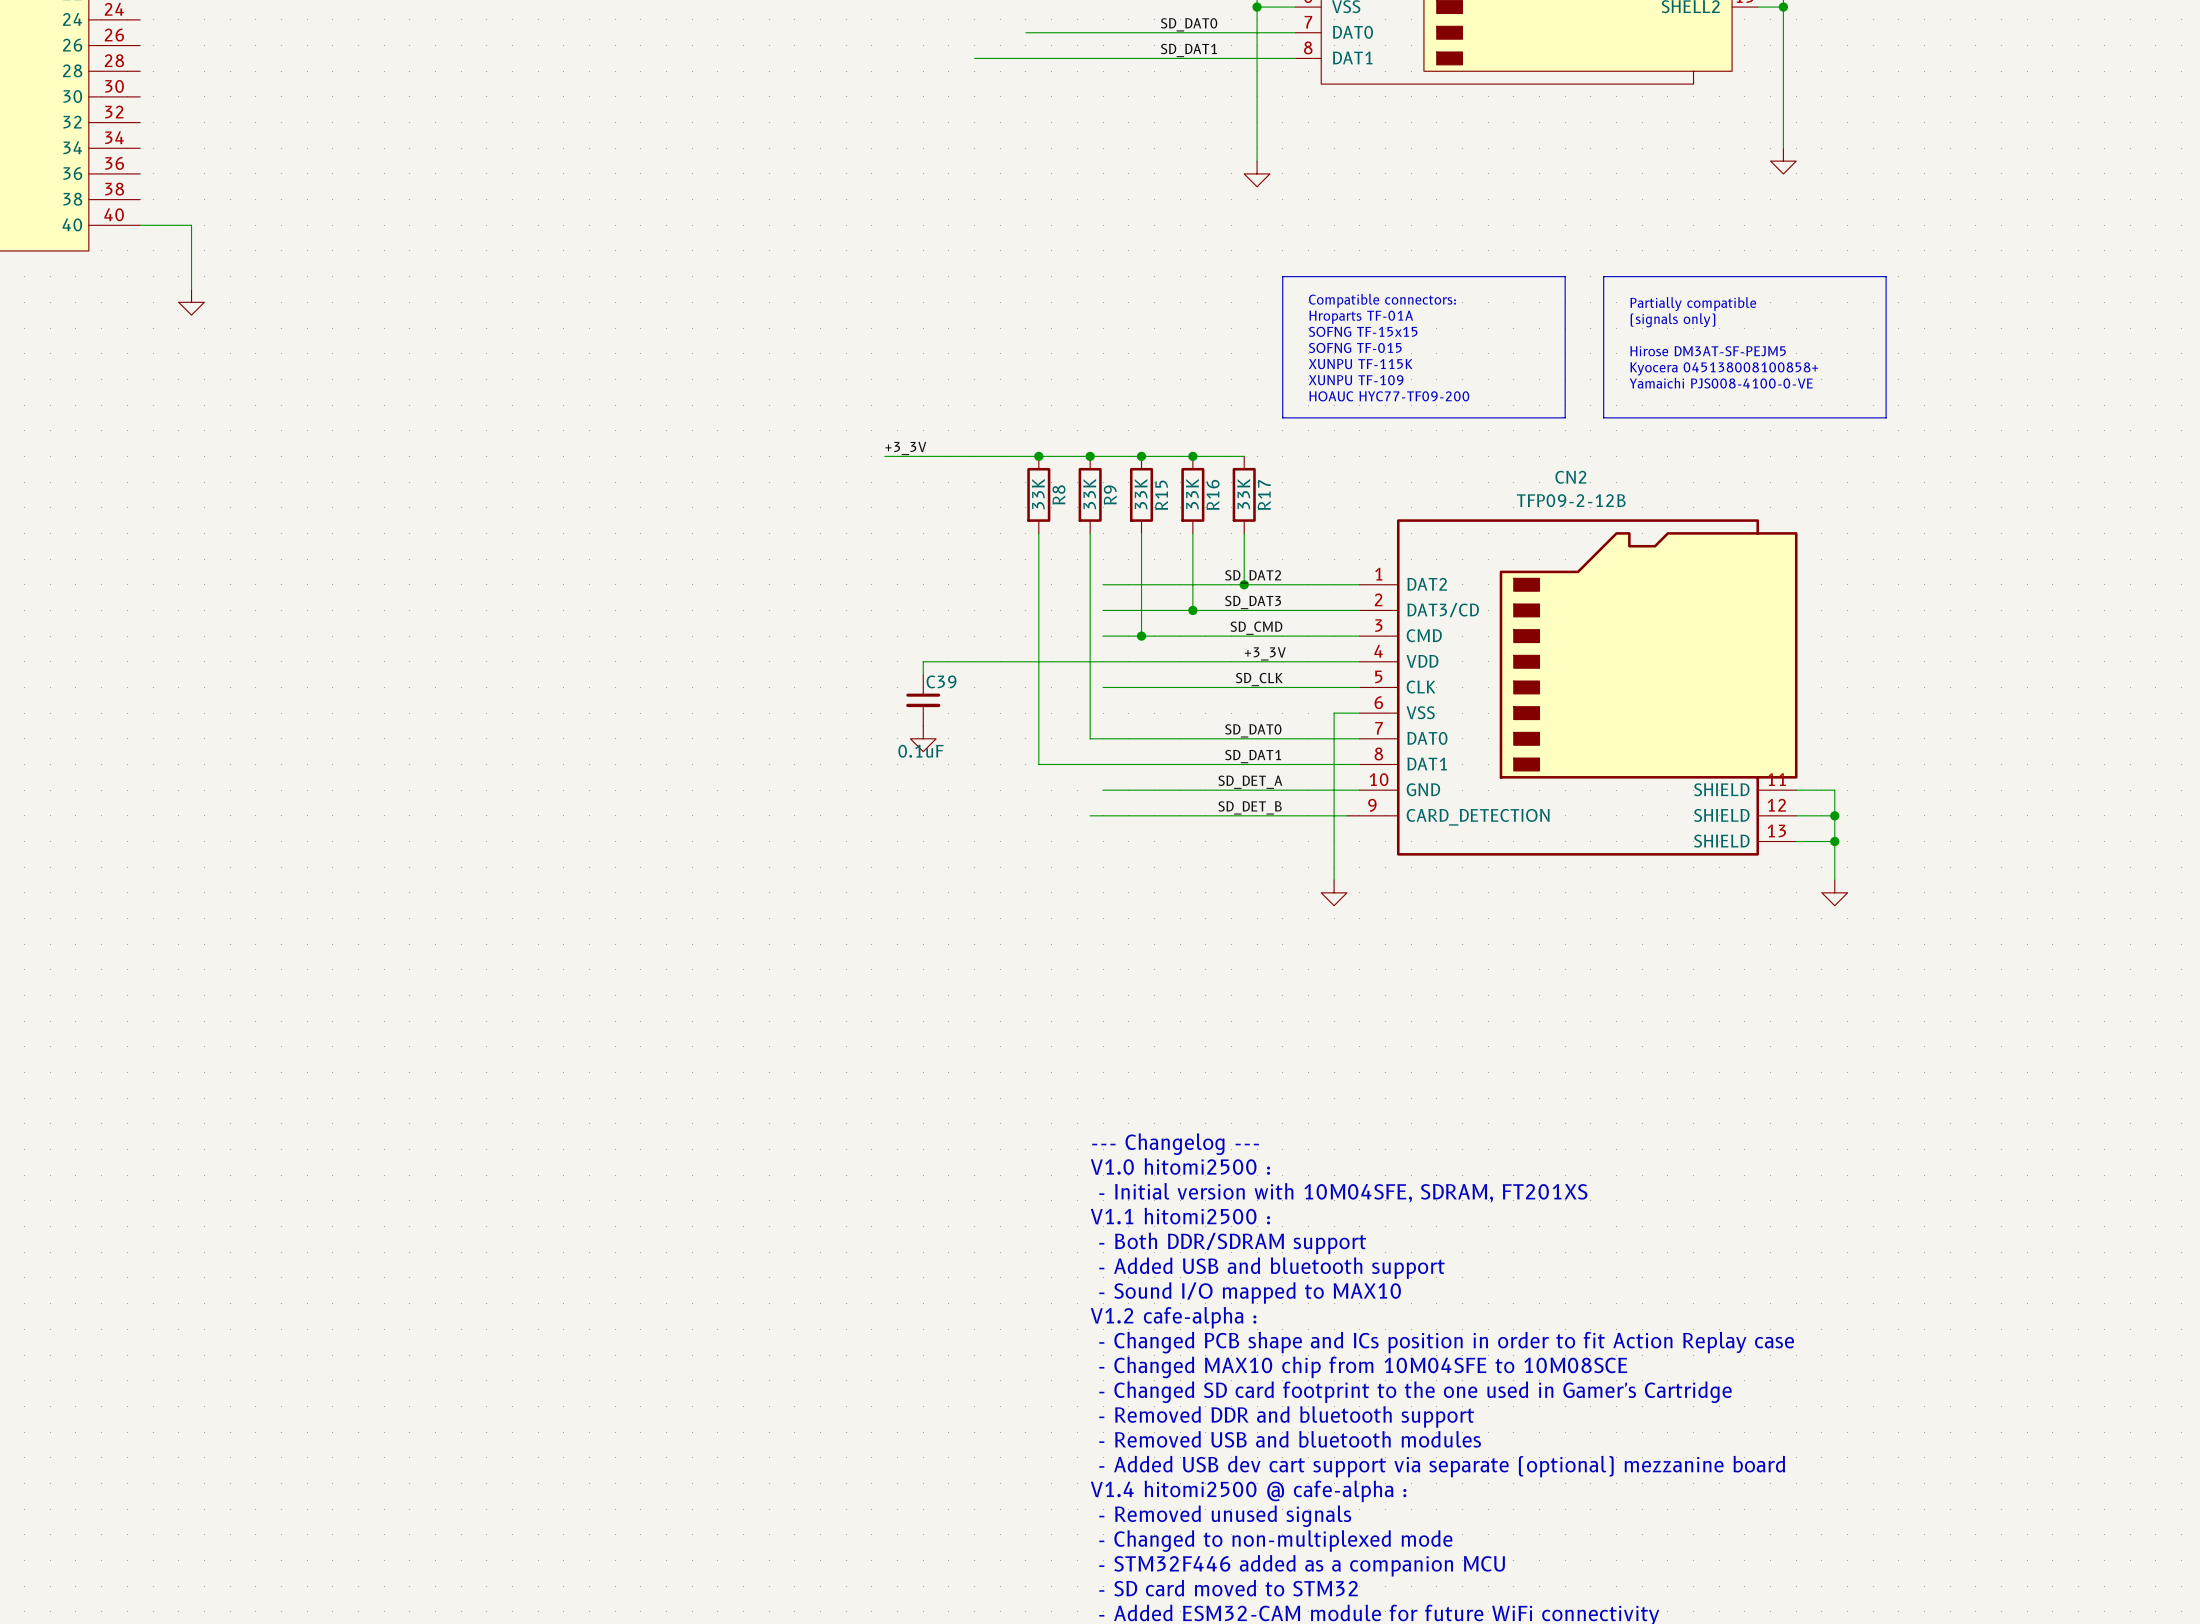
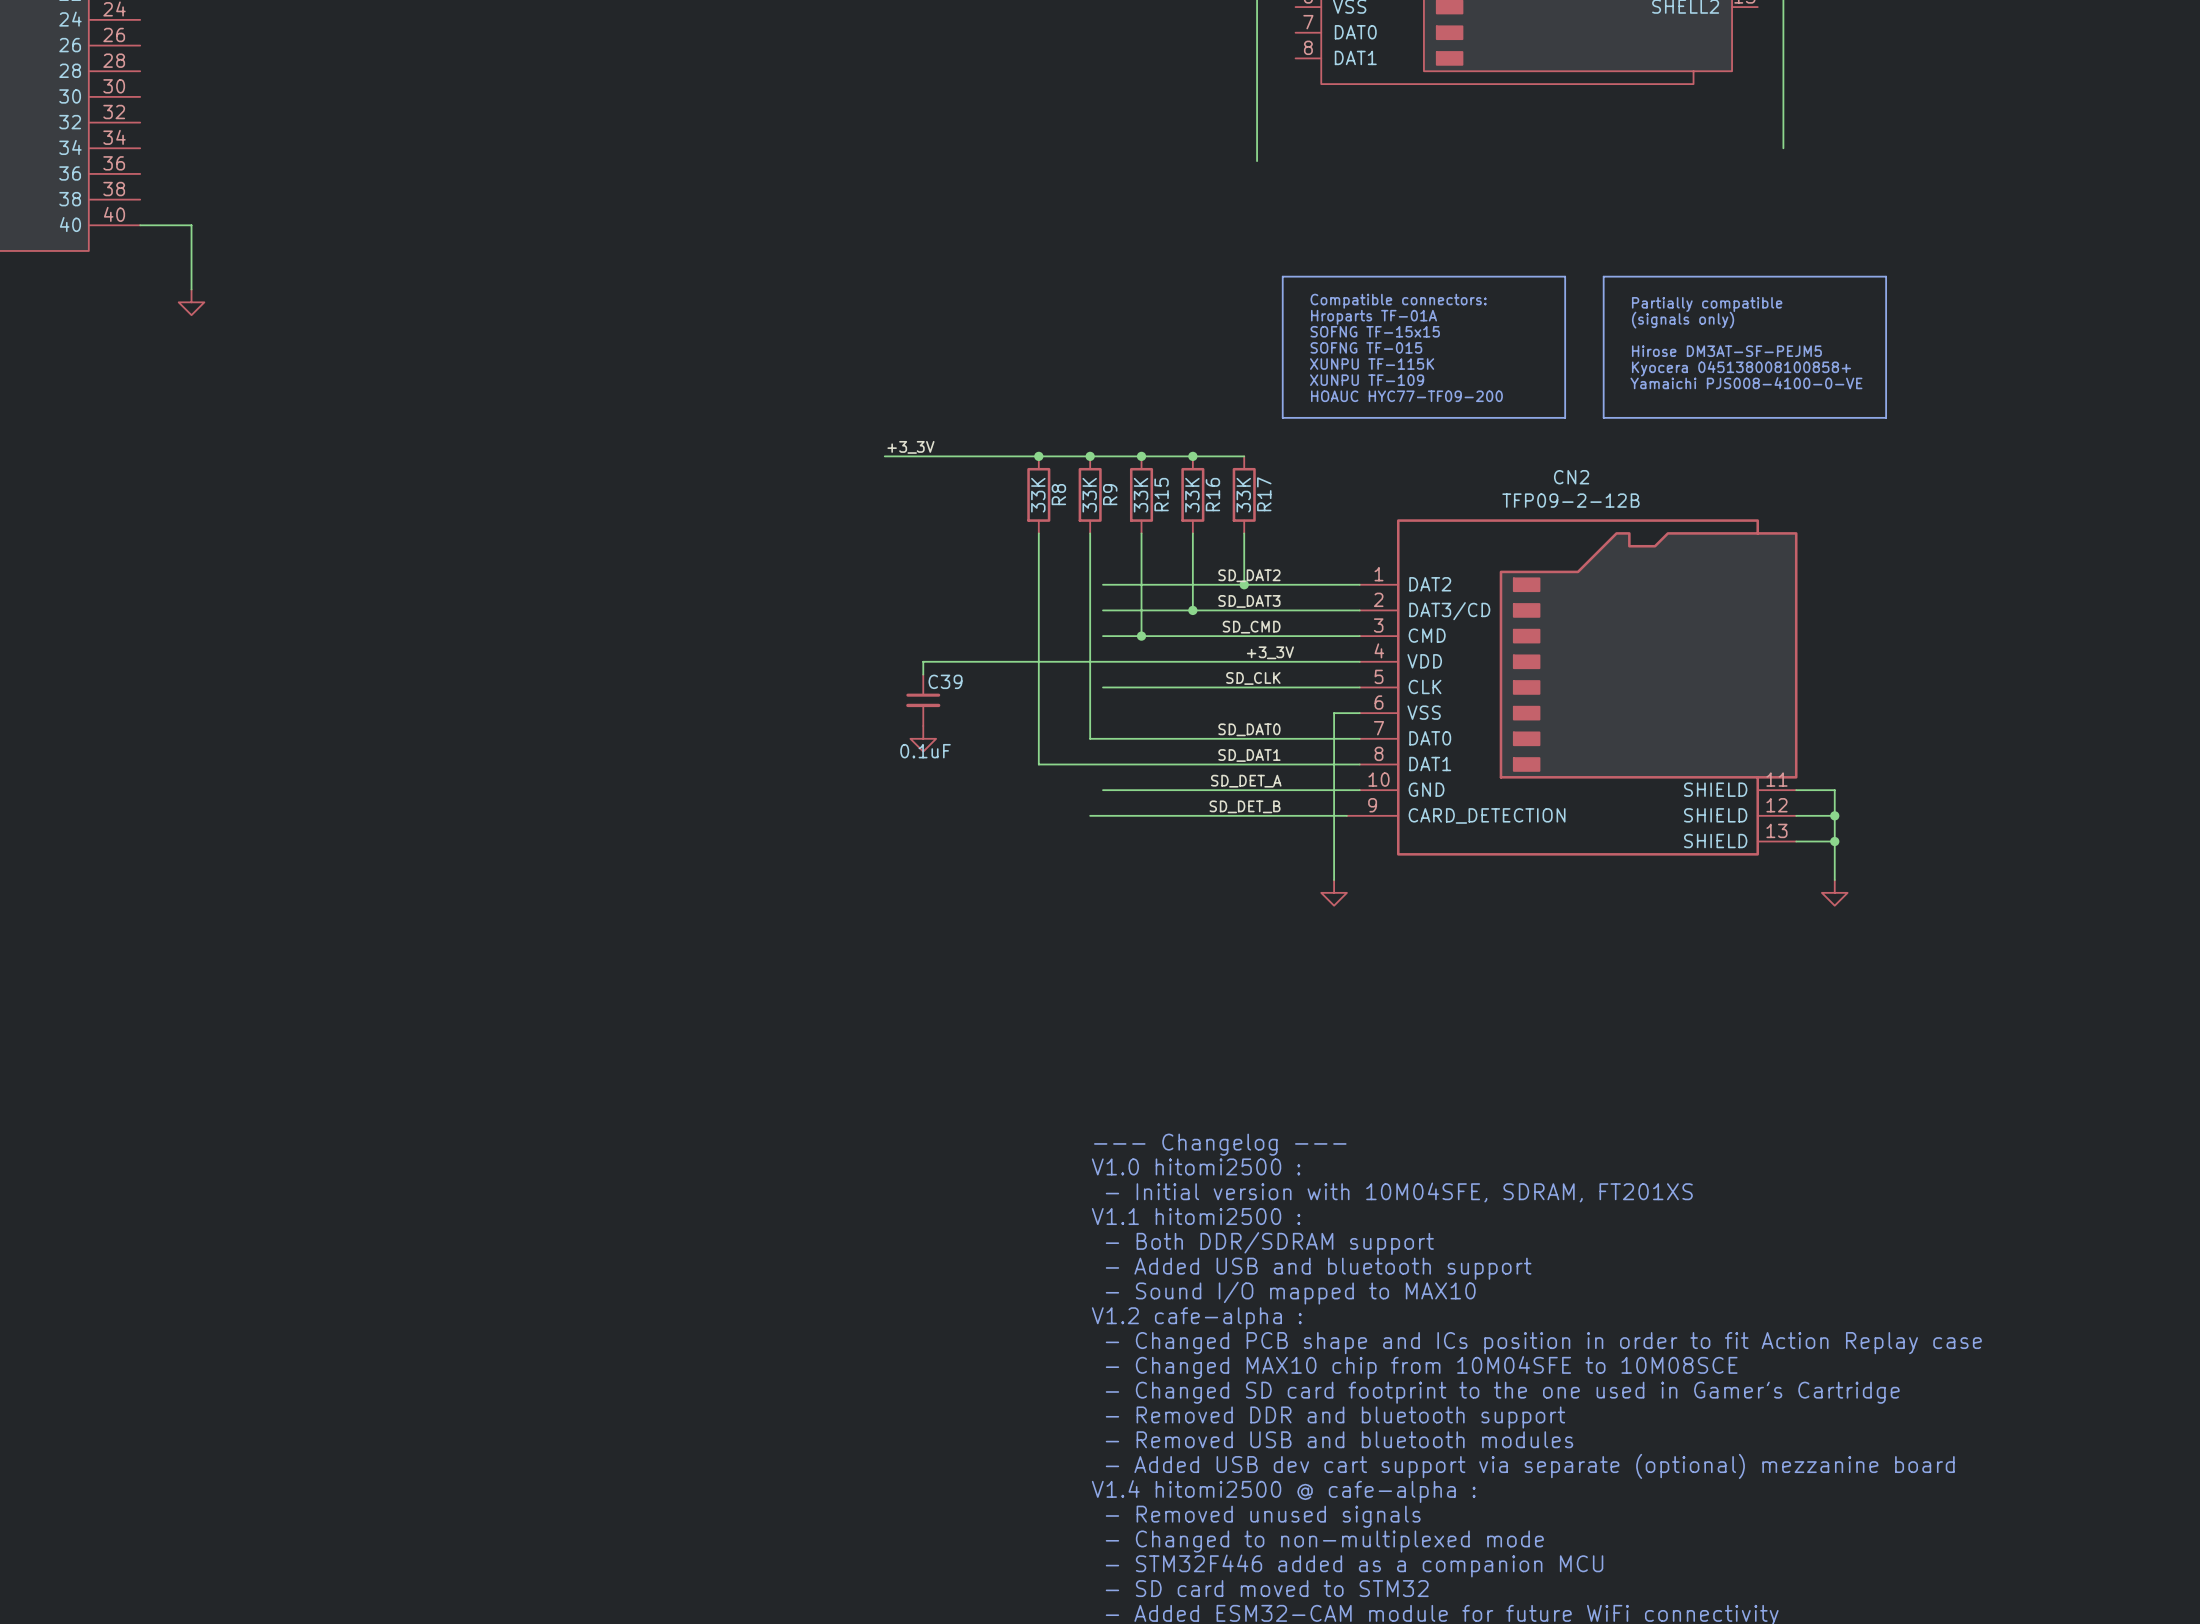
wire: (1257, 7) (1295, 7) -> none
junction: (1257, 7) -> none
wire: (1757, 7) (1783, 7) -> none
junction: (1783, 7) -> none
label: SD_DAT0 (1189, 24) -> none
wire: (1025, 32) (1295, 32) -> none
label: SD_DAT1 (1188, 50) -> none
wire: (974, 58) (1295, 58) -> none
power symbol: (1783, 161) -> none
power symbol: (1257, 173) -> none

